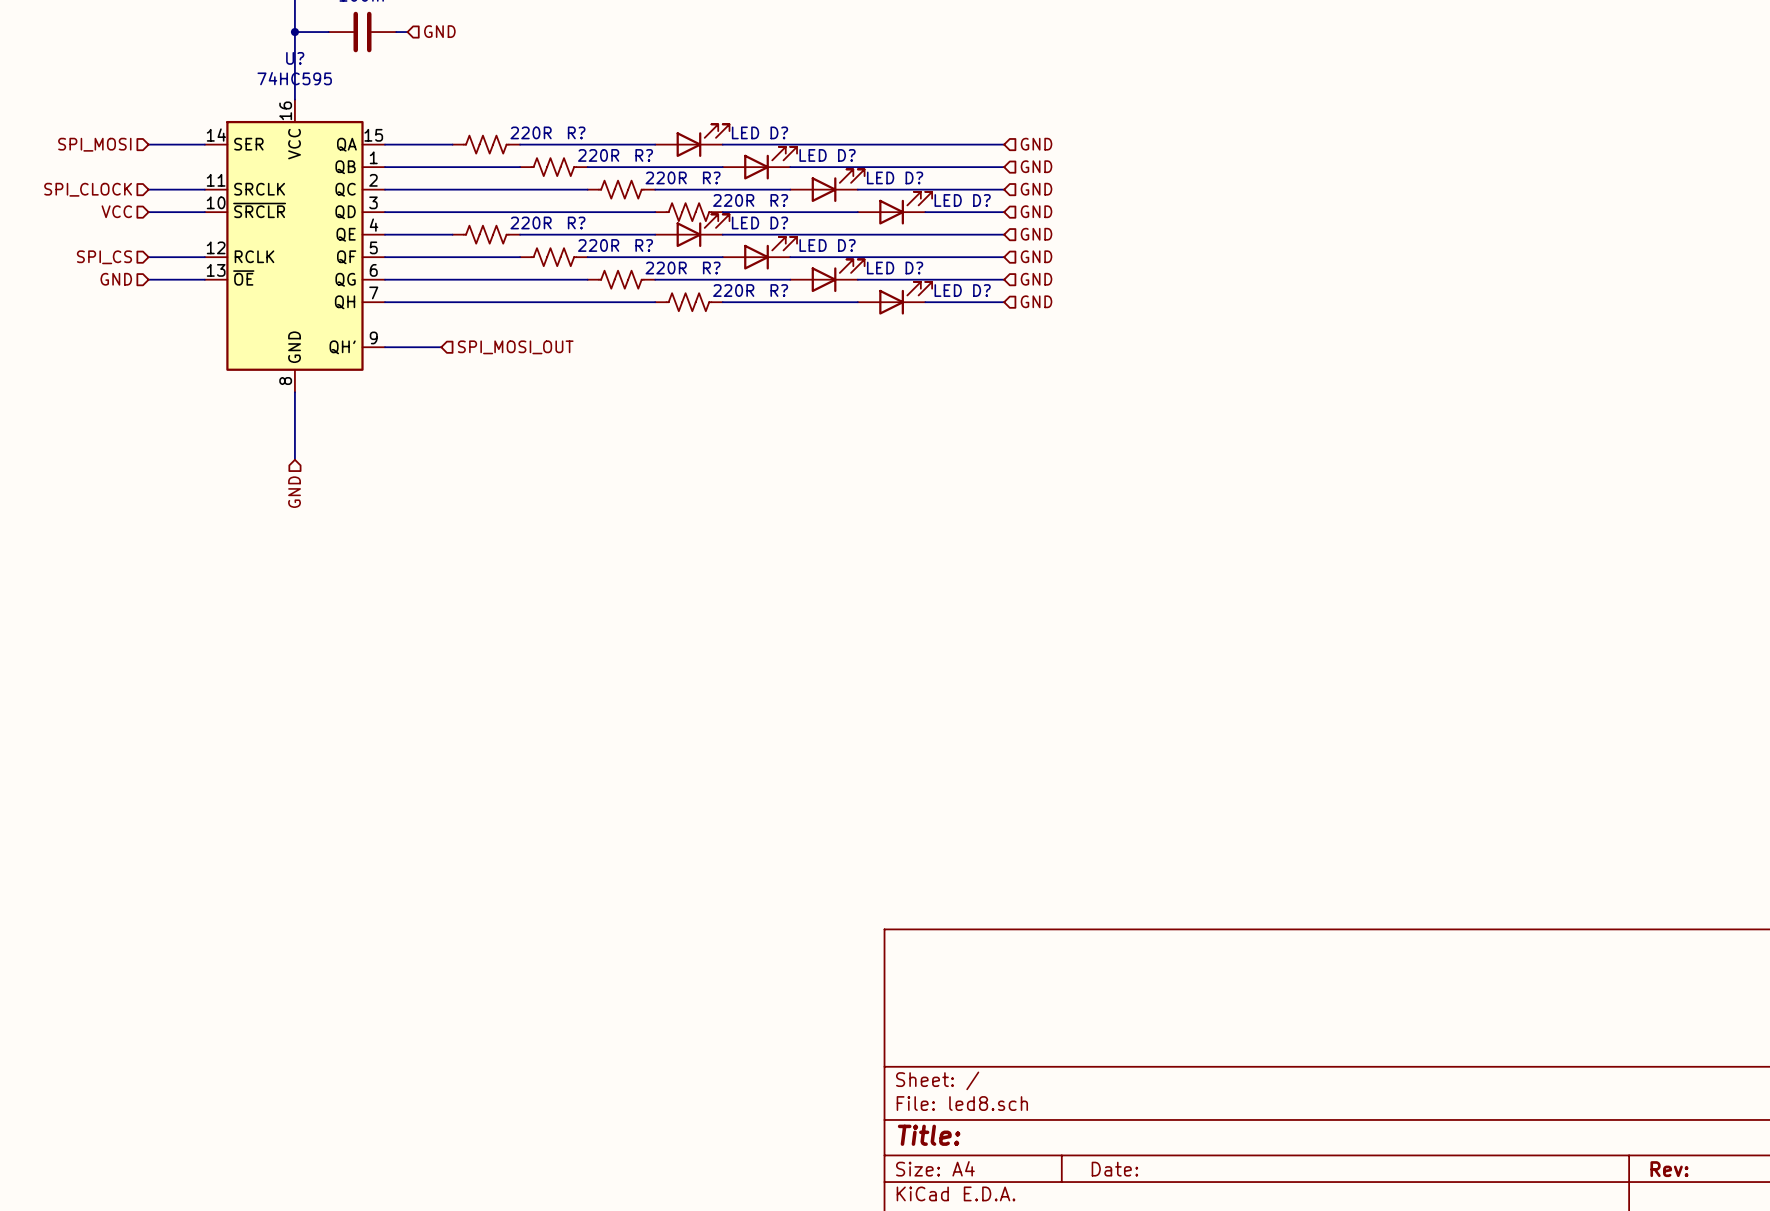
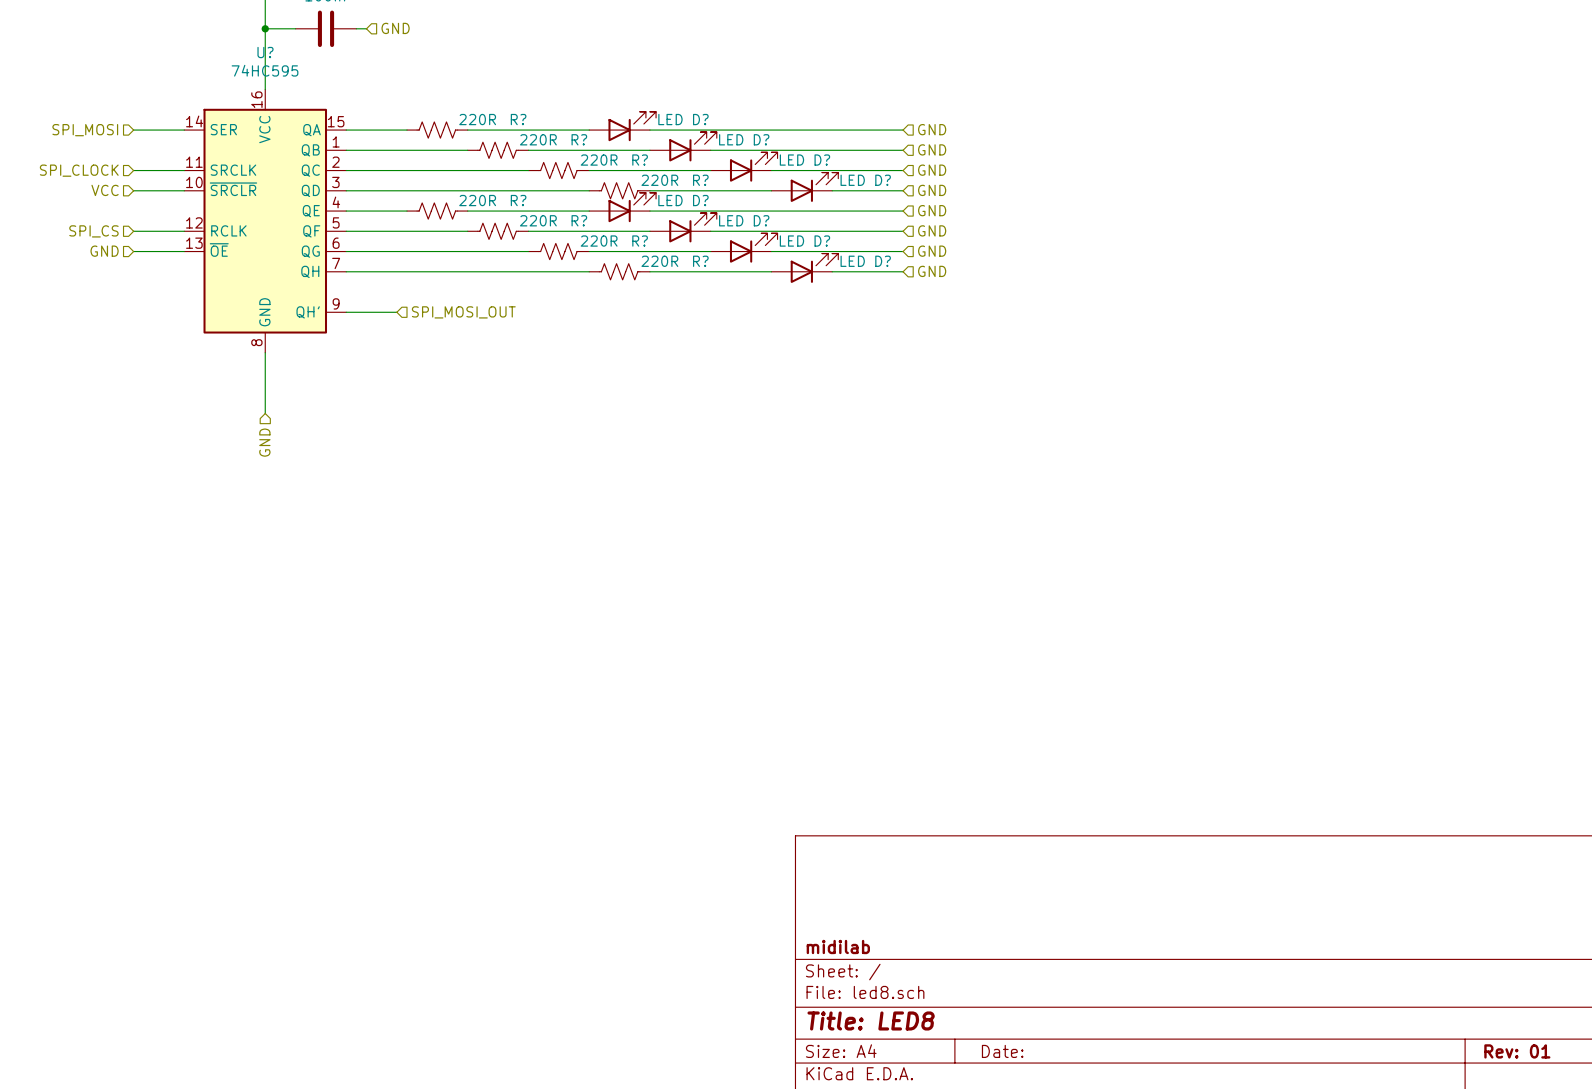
title block: none -> midilab (838, 946)
title block: Title: (929, 1135) -> Title: LED8 (871, 1020)
title block: Rev: (1669, 1169) -> Rev: 01 (1517, 1051)

